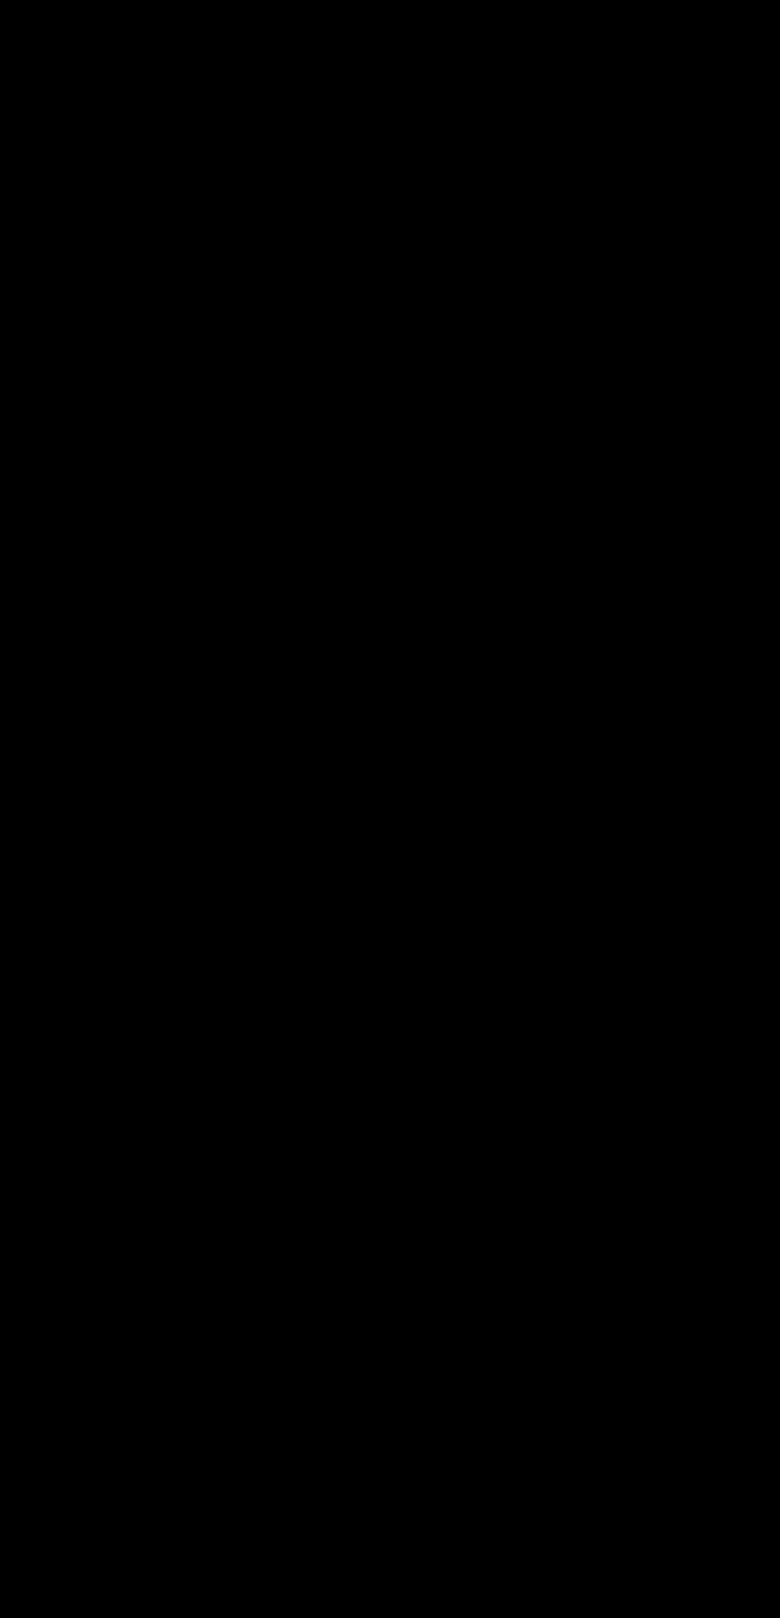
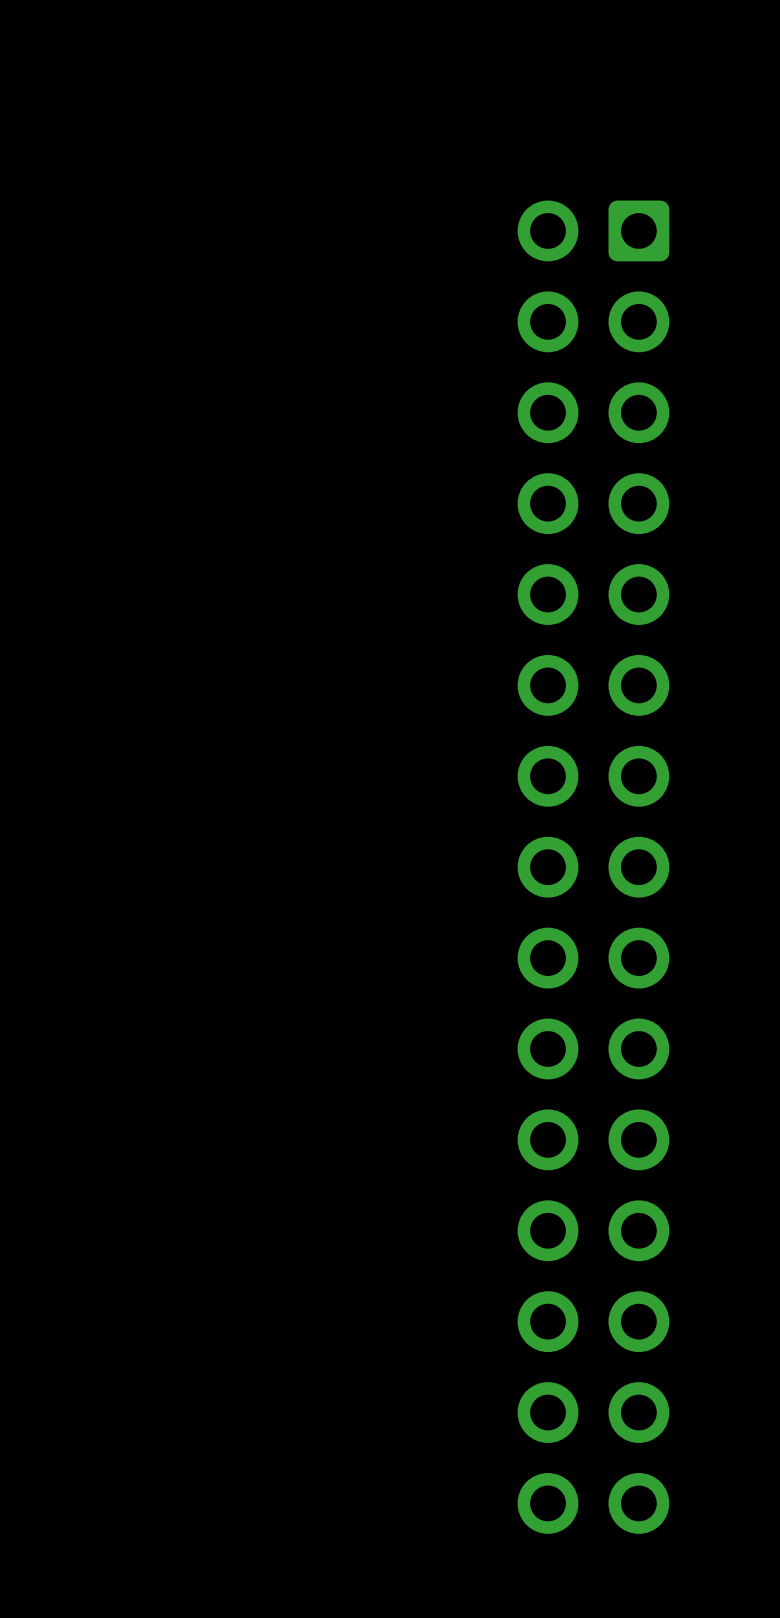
part: none -> (593, 867)

